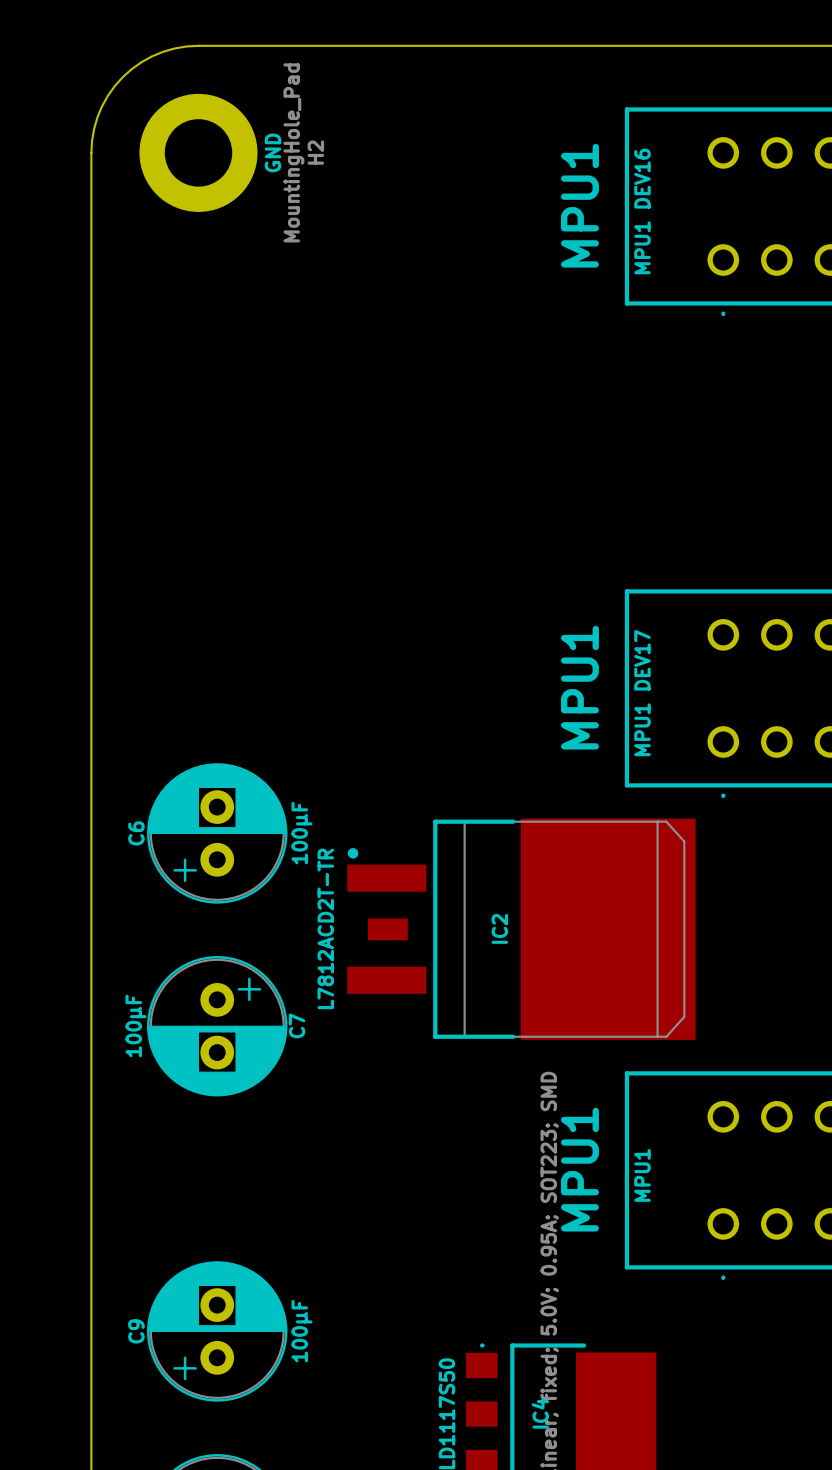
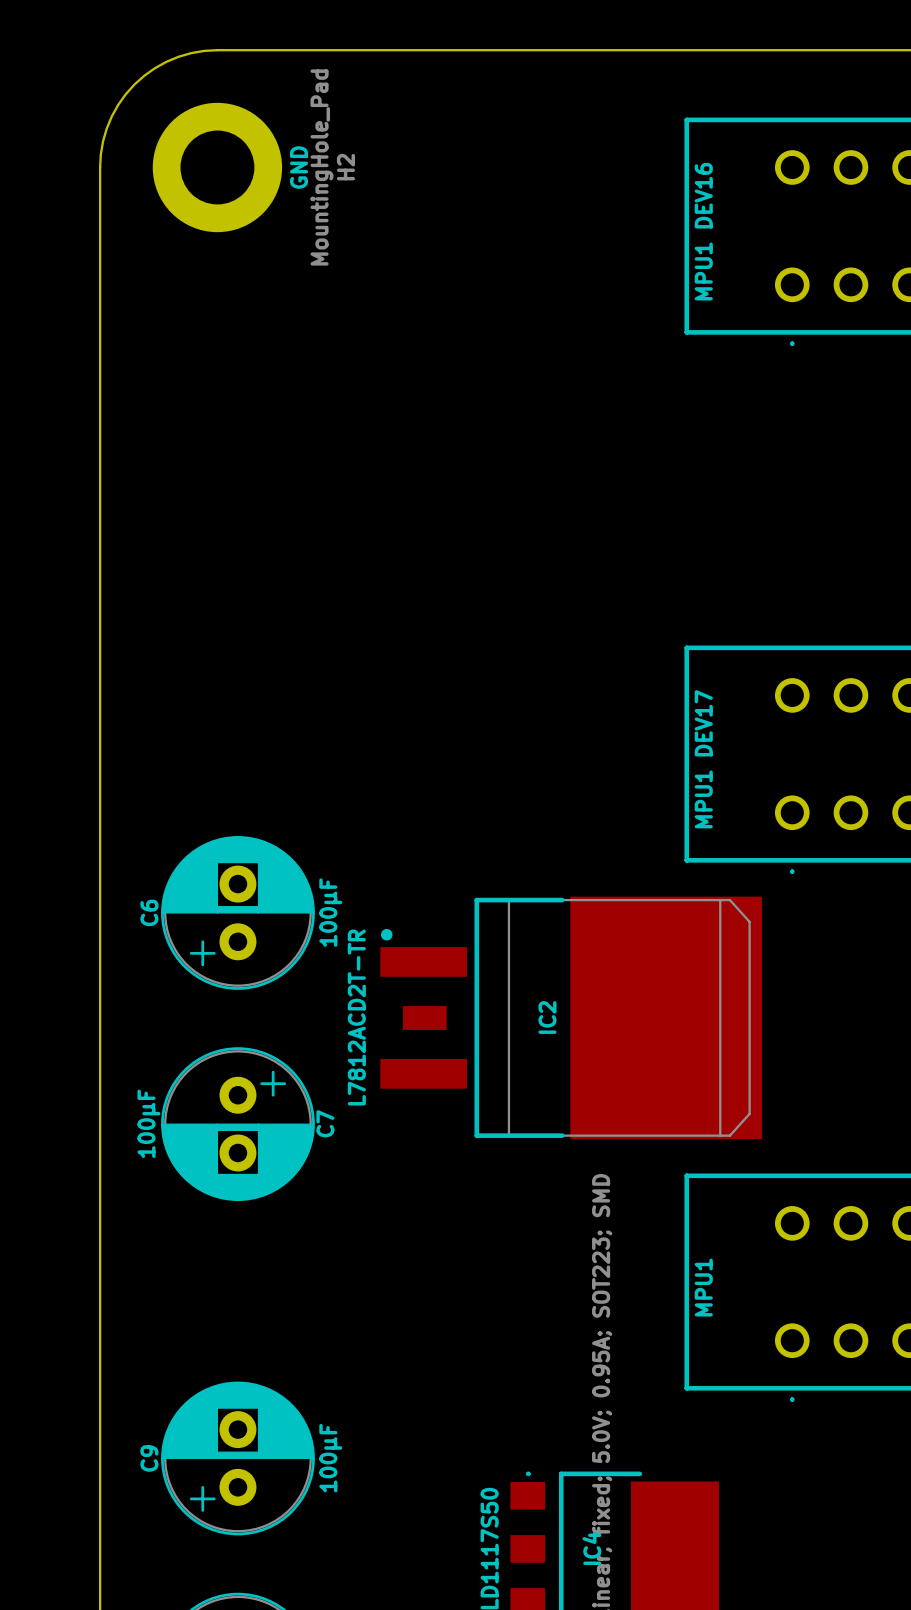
text: MPU1 (579, 205) -> none
text: MPU1 (579, 687) -> none
text: MPU1 (579, 1169) -> none

